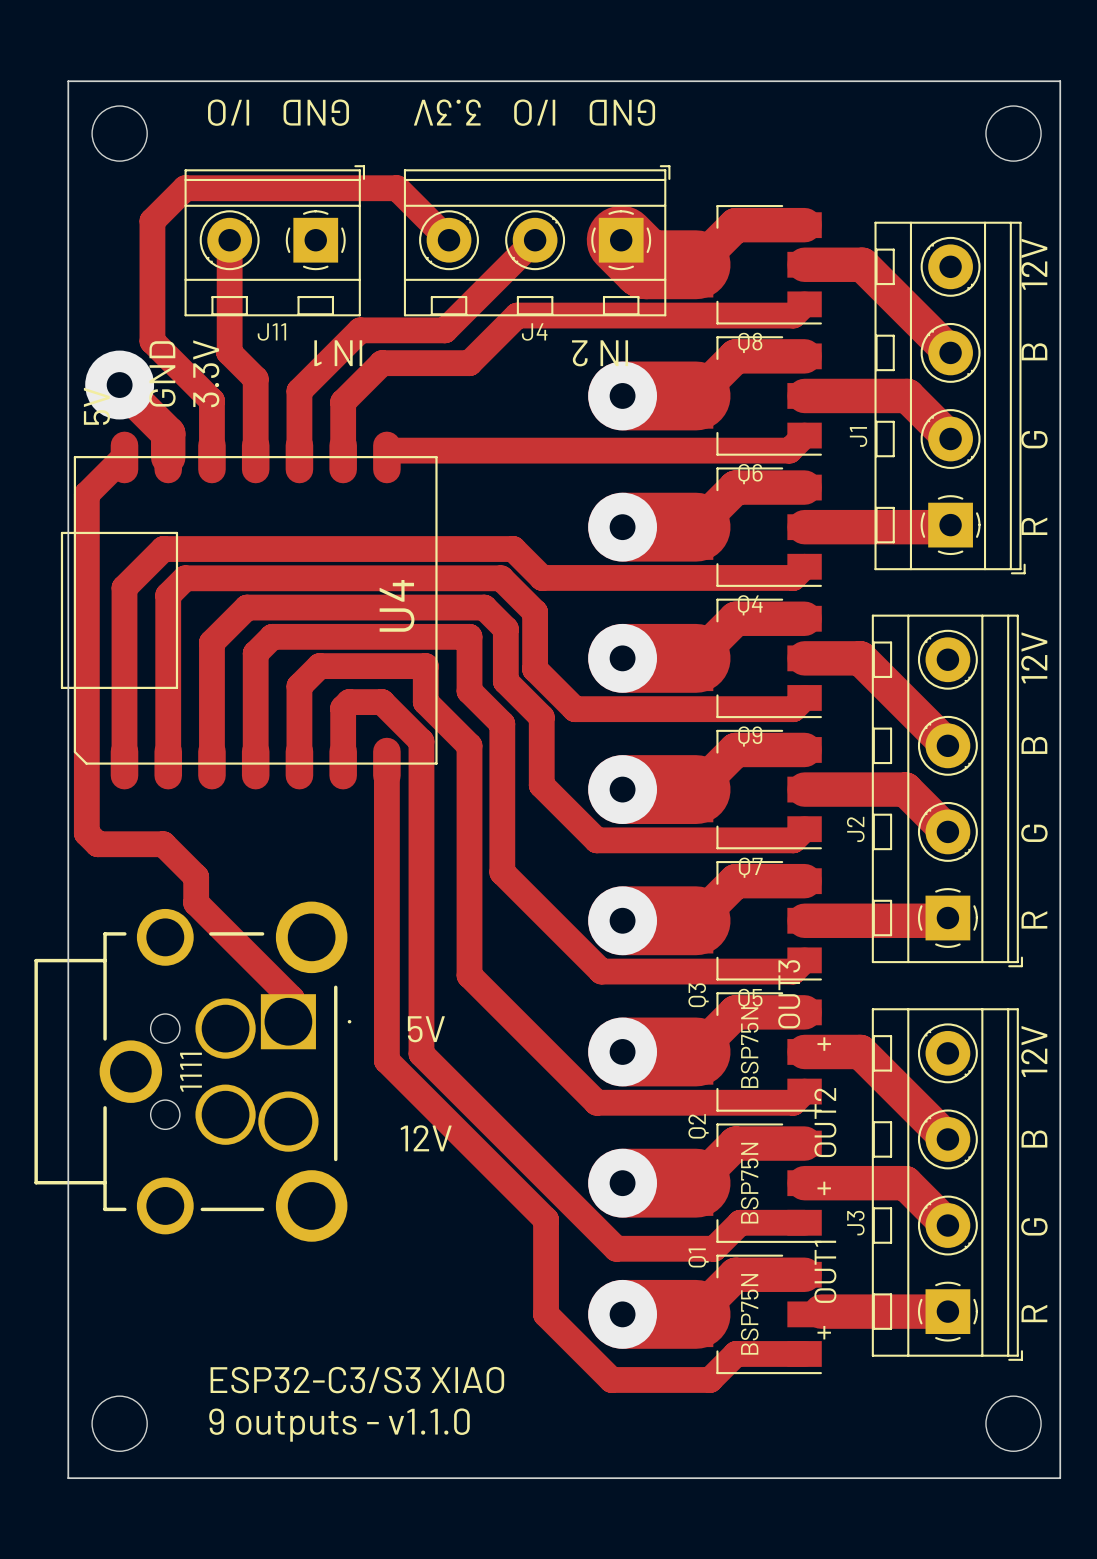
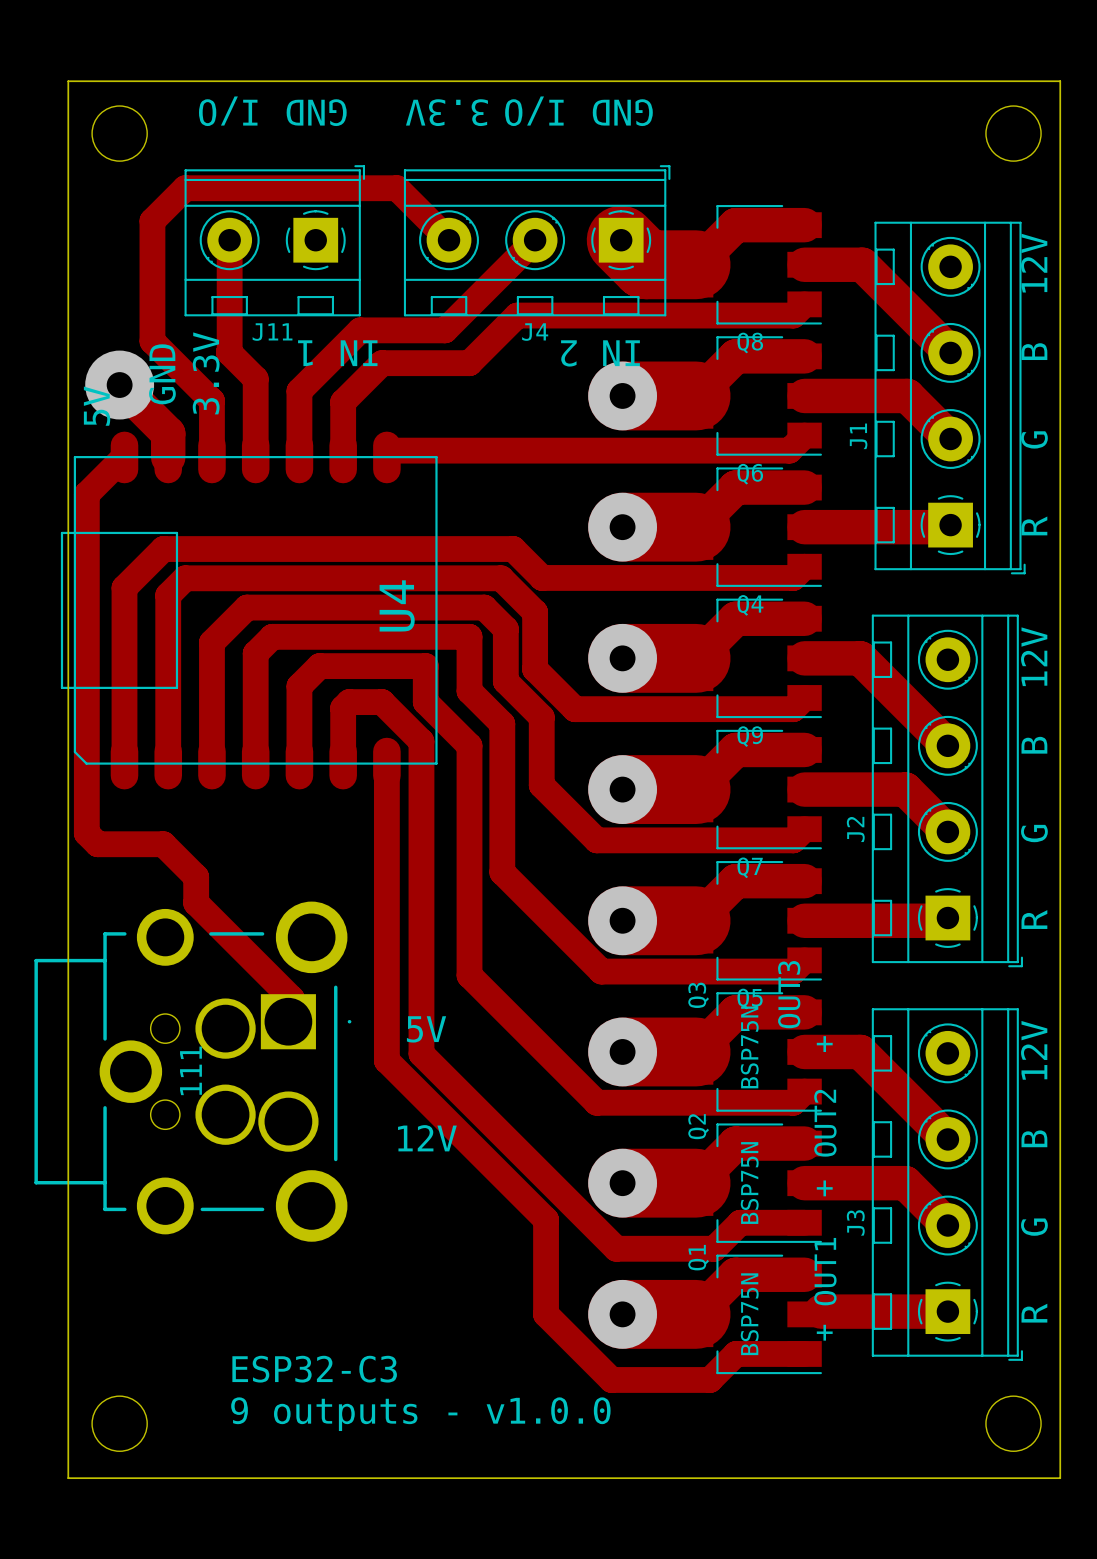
1111 name: 1111 (190, 1072) -> 111 (190, 1070)
text: ESP32-C3/S3 XIAO (357, 1380) -> ESP32-C3 (314, 1369)
text: 9 outputs - v1.1.0 (339, 1425) -> 9 outputs - v1.0.0 (420, 1414)

